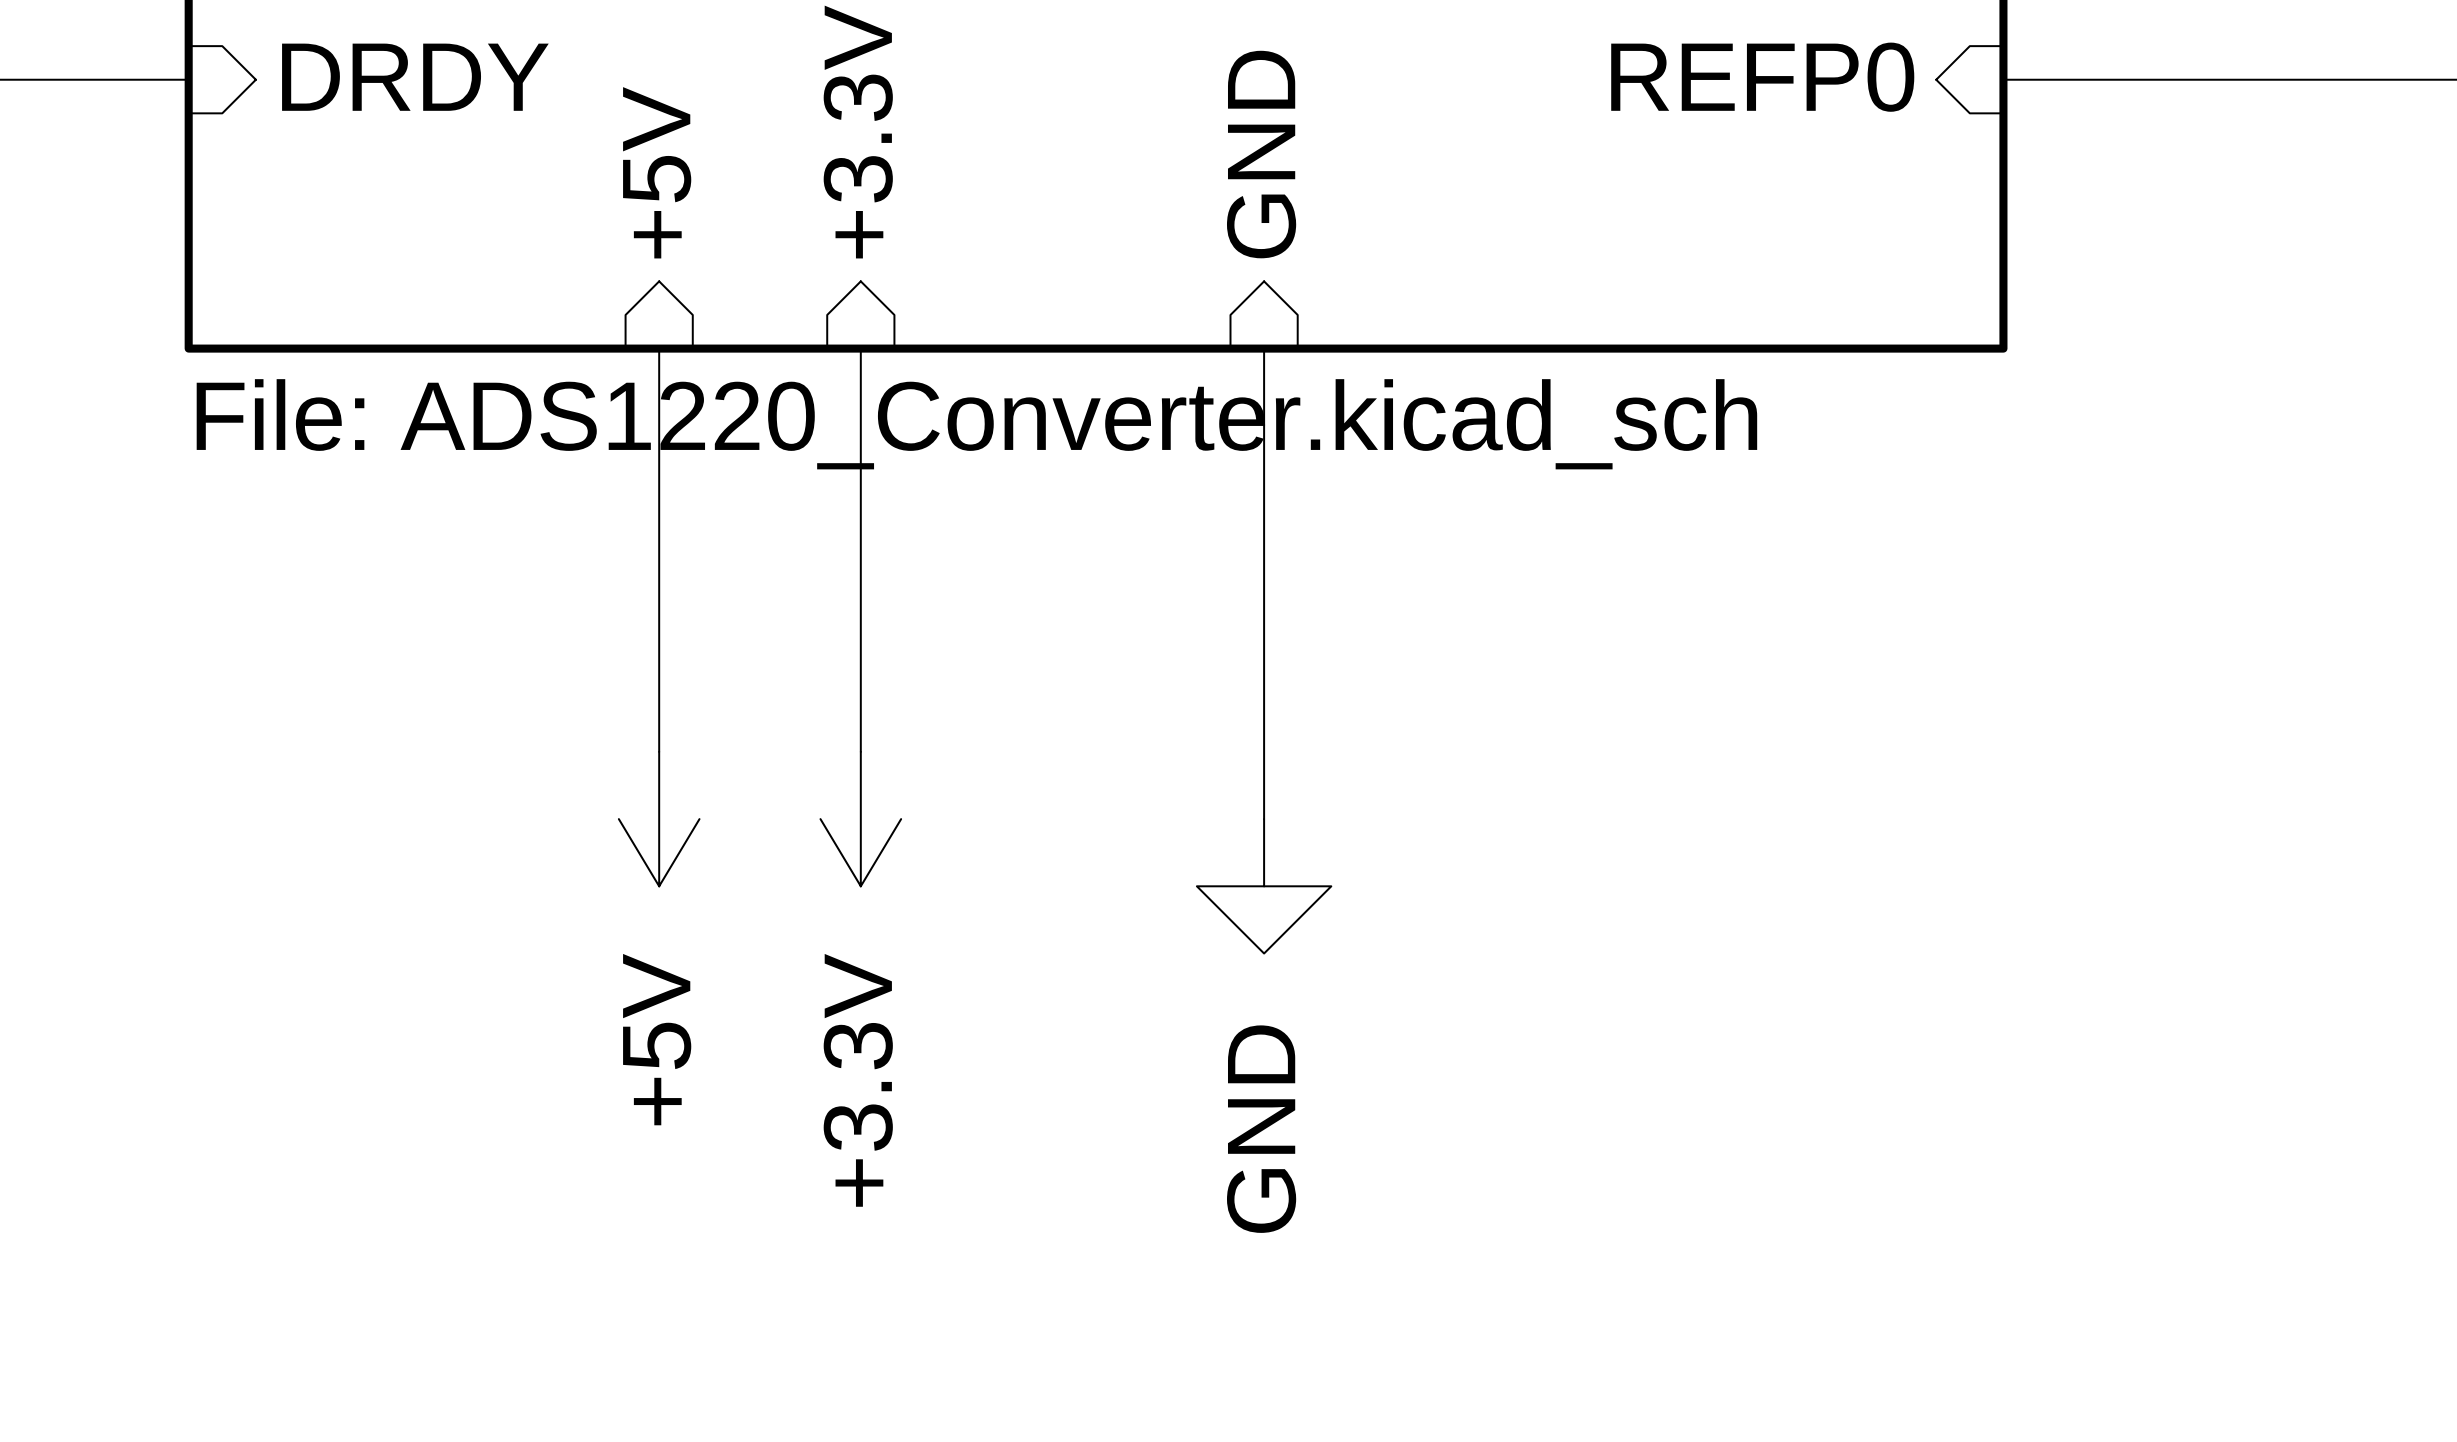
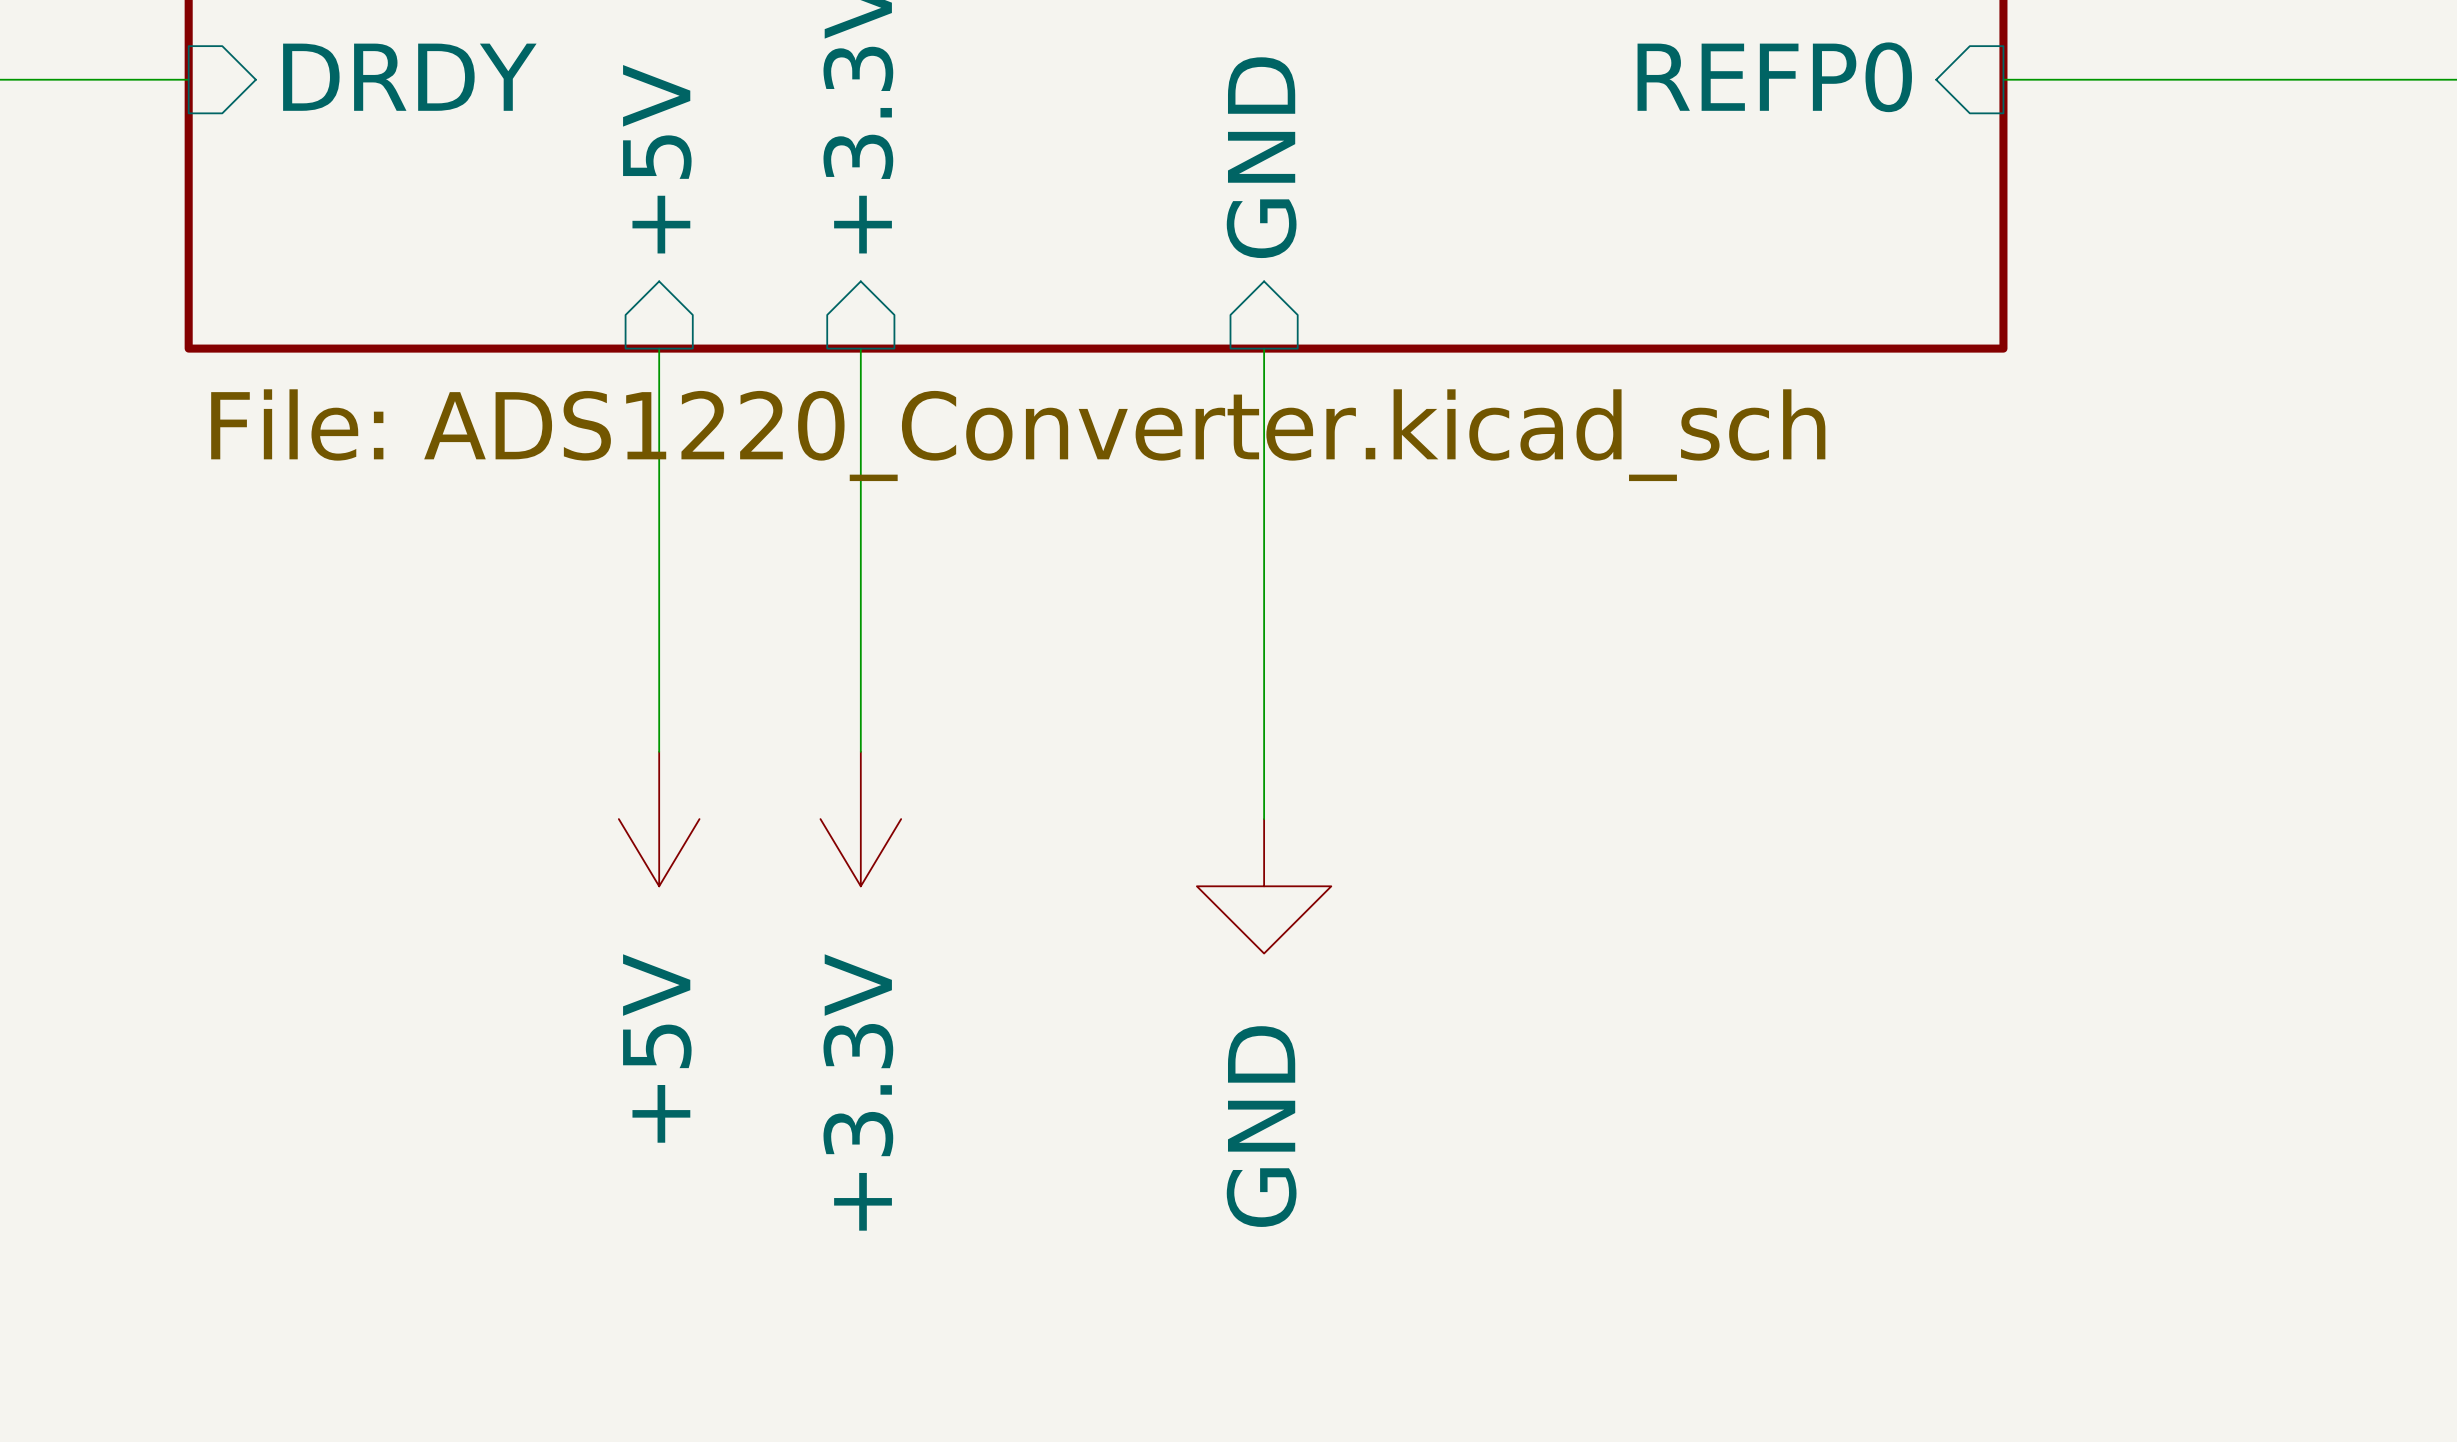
sheet value position: File: ADS1220_Converter.kicad_sch (976, 424) -> File: ADS1220_Converter.kicad_sch (1018, 435)

